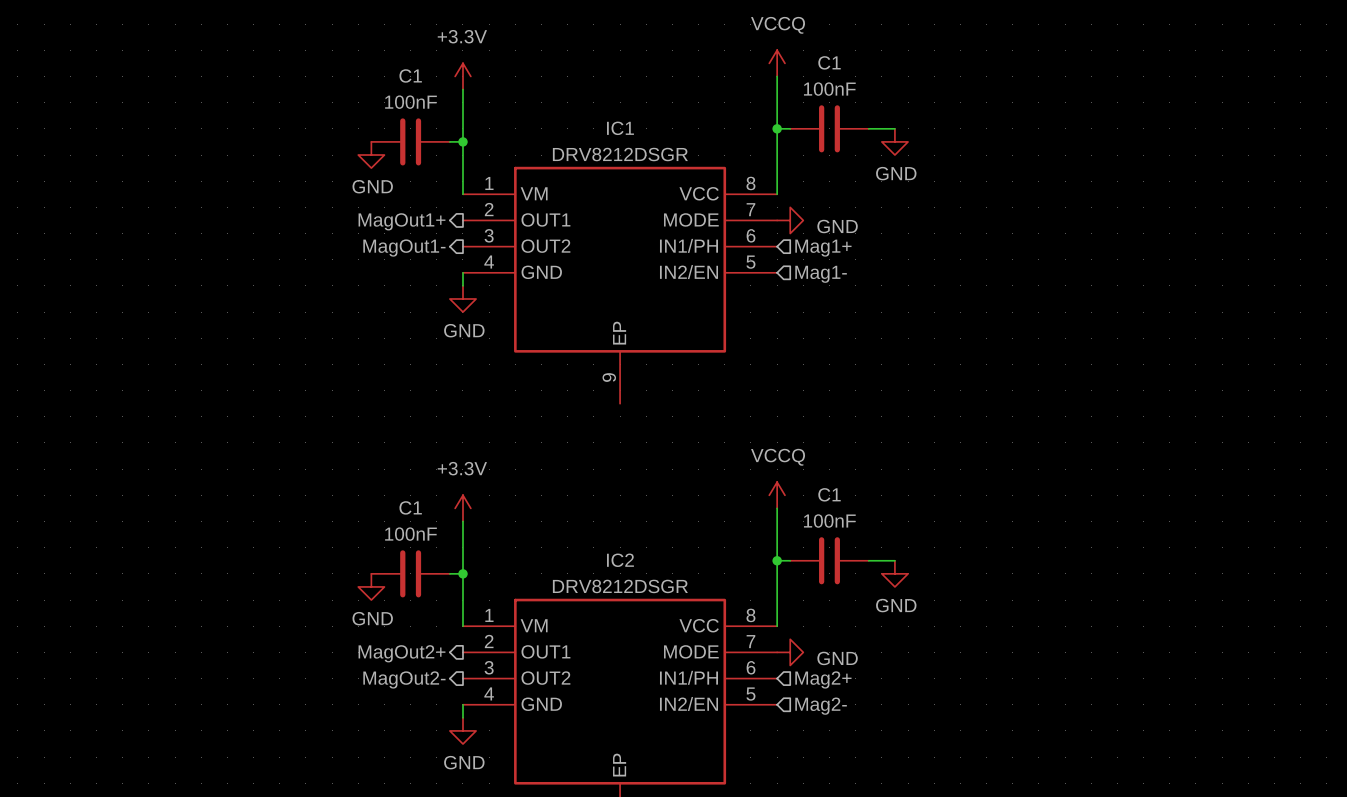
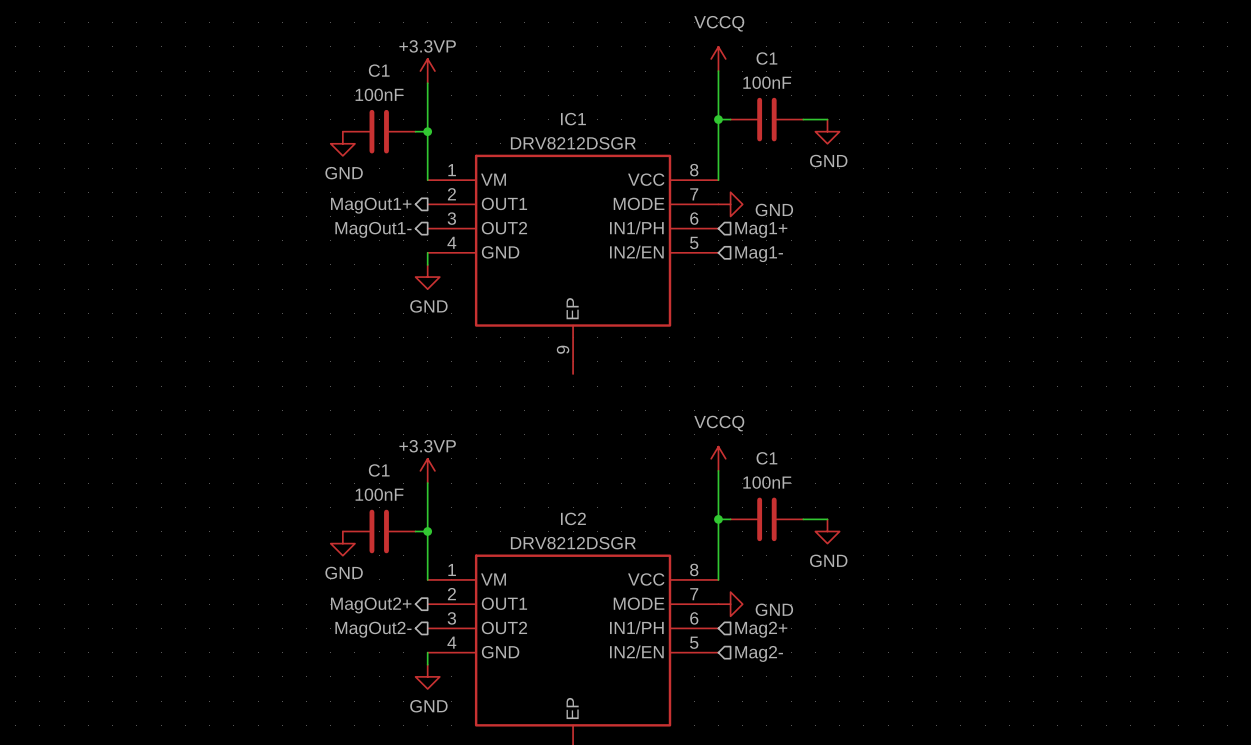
power symbol: +3.3V (462, 76) -> +3.3VP (427, 71)
power symbol: +3.3V (462, 508) -> +3.3VP (427, 470)

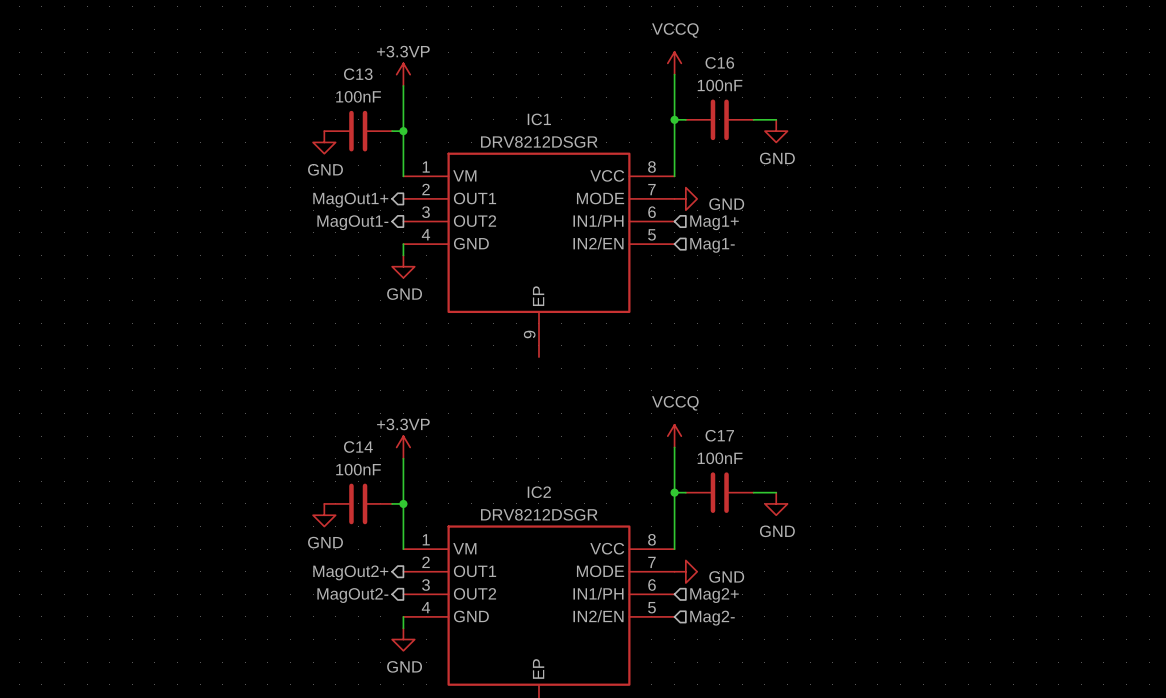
C1 name: C1 (766, 58) -> C16 (719, 62)
C1 name: C1 (379, 70) -> C13 (358, 74)
C1 name: C1 (766, 458) -> C17 (719, 435)
C1 name: C1 (379, 470) -> C14 (358, 447)

